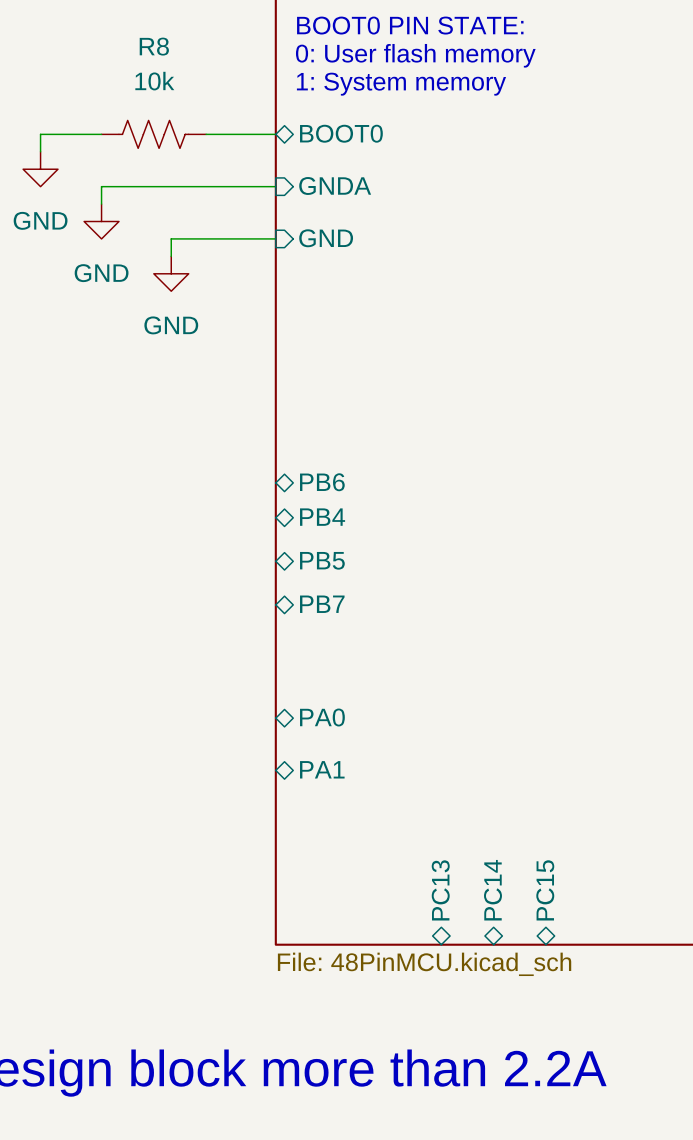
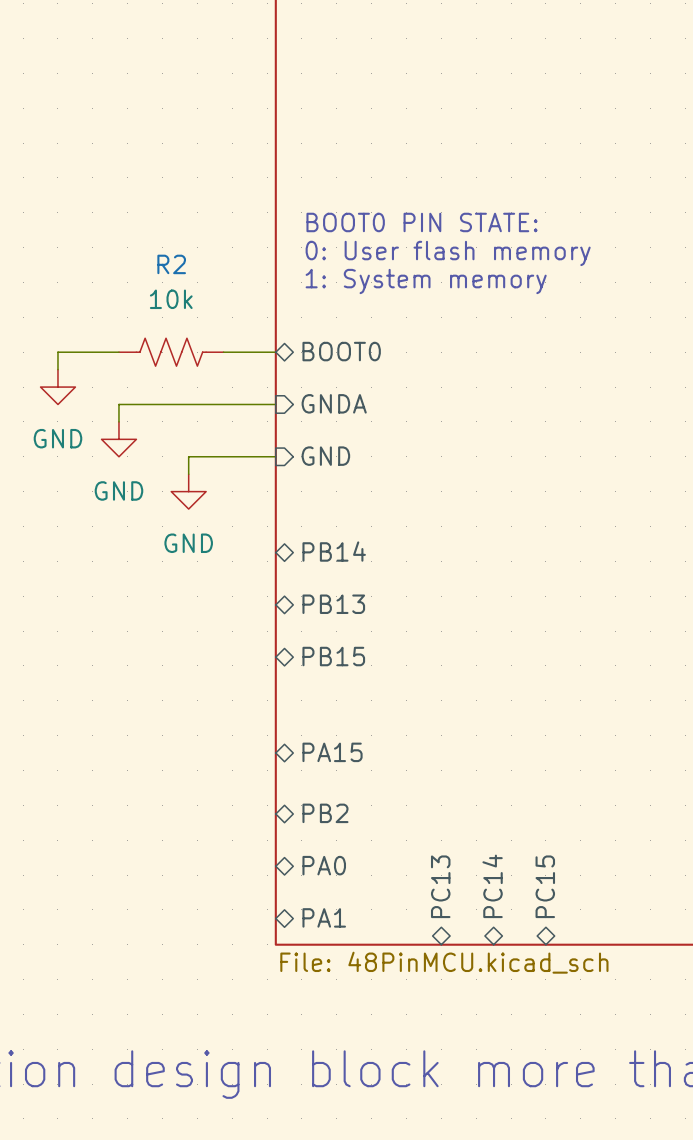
text position: BOOT0 PIN STATE: (410, 25) -> BOOT0 PIN STATE: (422, 222)
text position: 0: User flash memory (415, 55) -> 0: User flash memory (448, 253)
text position: 1: System memory (401, 84) -> 1: System memory (426, 281)
sheet pin position: BOOT0 (341, 133) -> BOOT0 (341, 351)
wire: (101, 134) (40, 134) (40, 151) -> (118, 352) (57, 352) (57, 369)
R8: 10k (153, 134) -> none
wire: (206, 134) (275, 134) -> none
power symbol: GND (40, 169) -> none
wire: (275, 186) (101, 186) (101, 204) -> none
sheet pin position: GNDA (335, 186) -> GNDA (334, 403)
power symbol: GND (101, 221) -> none
wire: (275, 238) (171, 238) (171, 256) -> none
sheet pin position: GND (326, 238) -> GND (325, 456)
power symbol: GND (171, 273) -> none
R2: none -> 10k (171, 352)
wire: none -> (223, 352) (275, 352)
power symbol: none -> GND (57, 387)
wire: none -> (275, 404) (118, 404) (118, 421)
power symbol: none -> GND (118, 439)
wire: none -> (275, 456) (188, 456) (188, 474)
sheet pin: PB6 (322, 482) -> none
power symbol: none -> GND (188, 491)
sheet pin: PB4 (322, 517) -> none
sheet pin: PB5 (322, 560) -> PB14 (334, 551)
sheet pin: PB7 (322, 604) -> PB13 (333, 604)
sheet pin: none -> PB15 (333, 656)
sheet pin position: PA0 (322, 717) -> PA0 (324, 865)
sheet pin: none -> PA15 (332, 752)
sheet pin position: PA1 (322, 769) -> PA1 (324, 917)
sheet pin: none -> PB2 (325, 813)

